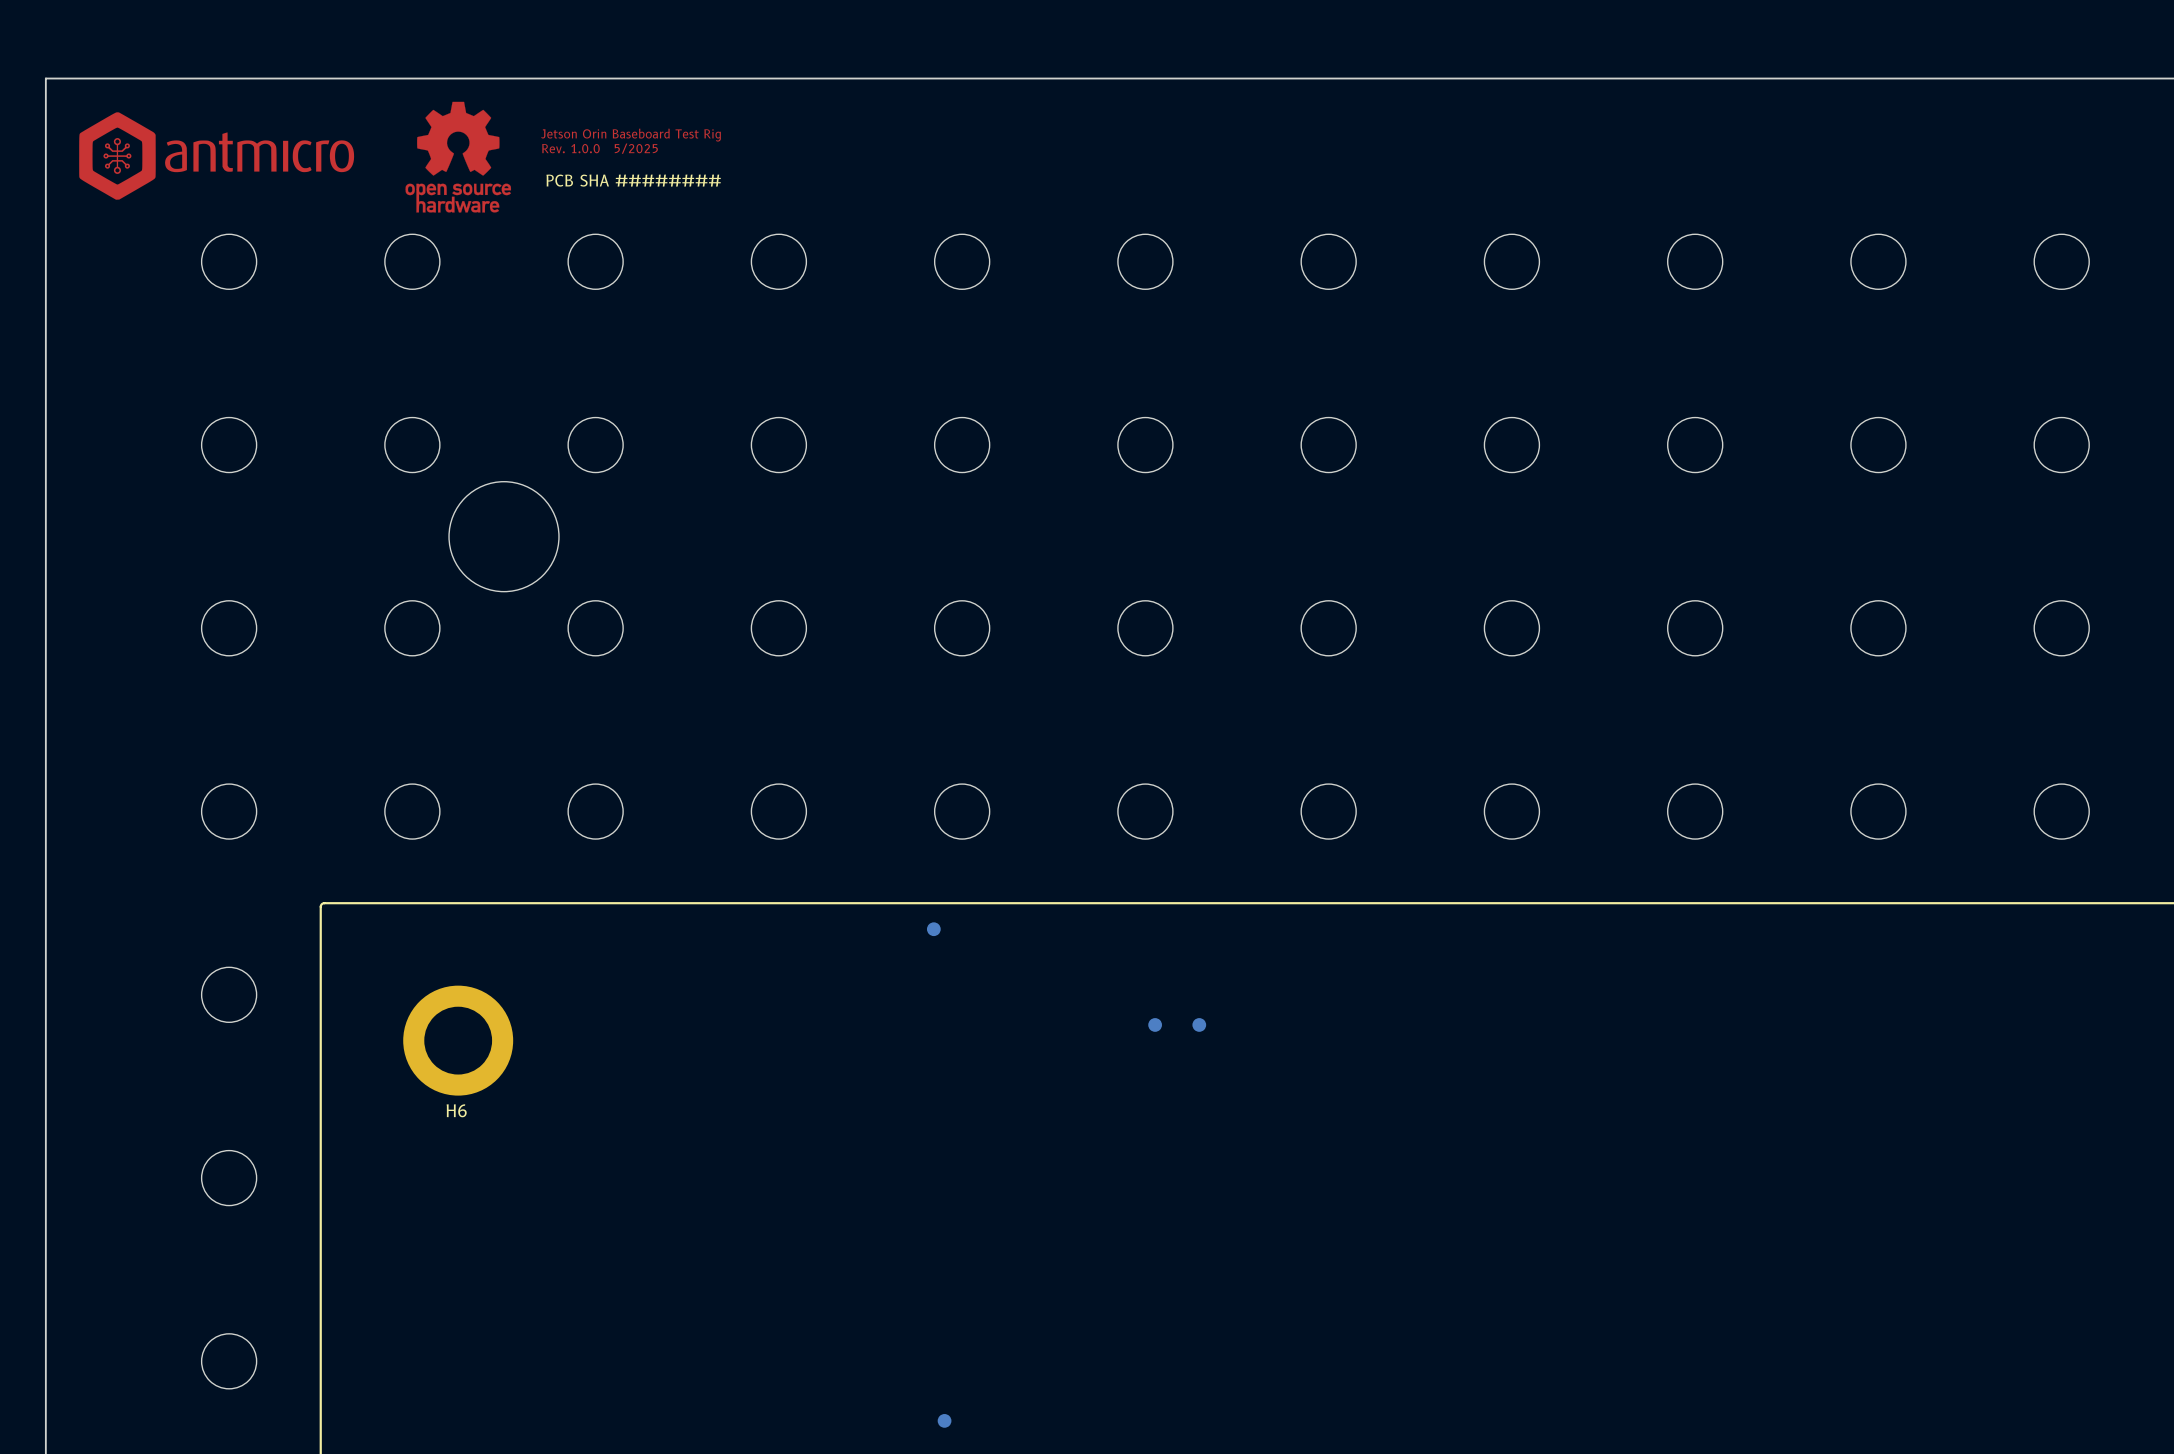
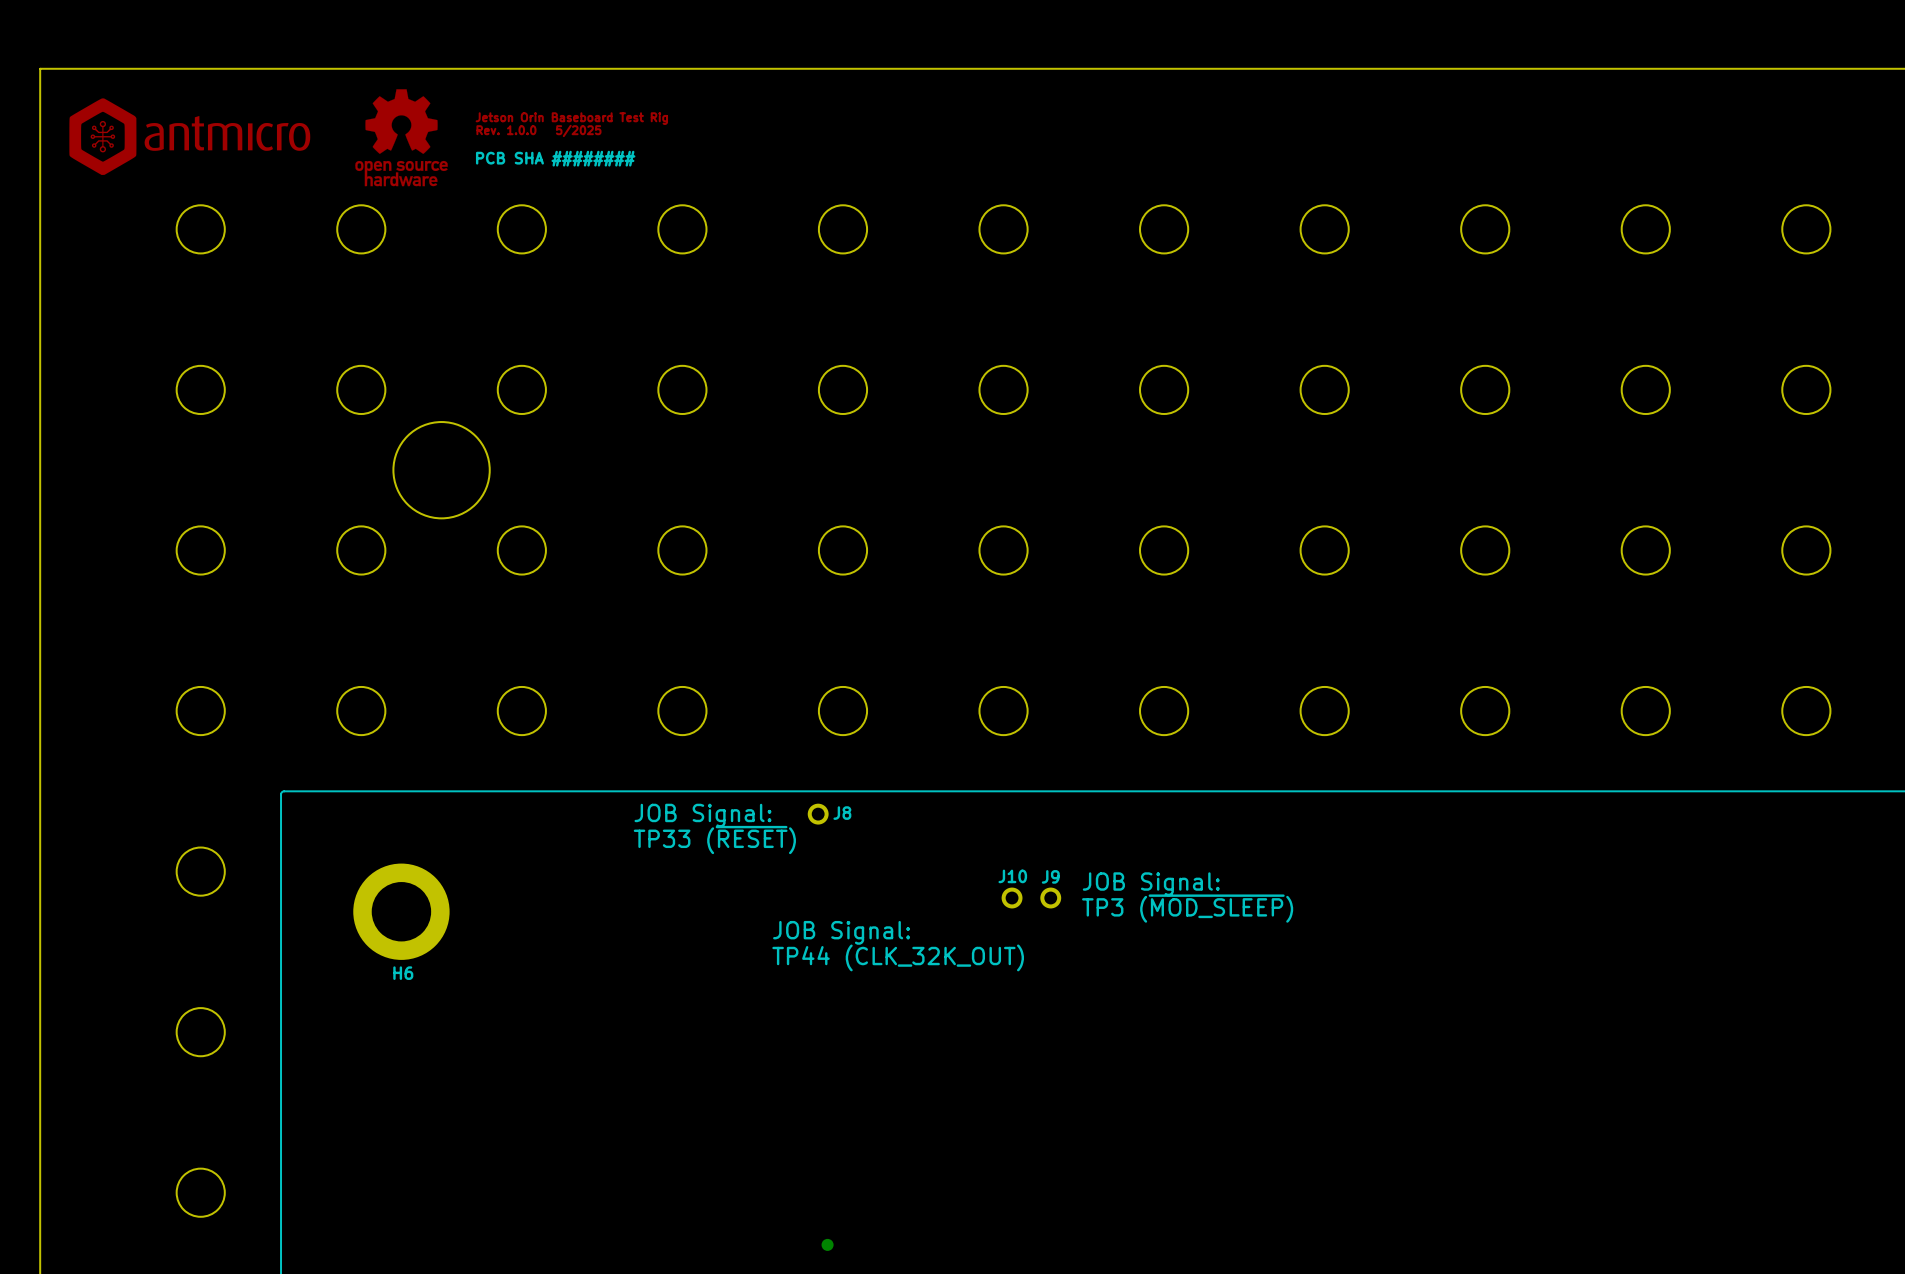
part: (933, 929) -> none
J8: none -> (818, 814)
text: none -> JOB Signal: (703, 815)
text: none -> TP33 (~{RESET}) (714, 840)
text: none -> JOB Signal: (1151, 884)
part: (1155, 1024) -> none
J10: none -> (1012, 898)
part: (1199, 1024) -> none
J9: none -> (1050, 898)
text: none -> TP3 (~{MOD_SLEEP}) (1187, 908)
text: none -> JOB Signal: (841, 932)
text: none -> TP44 (CLK_32K_OUT) (898, 957)

